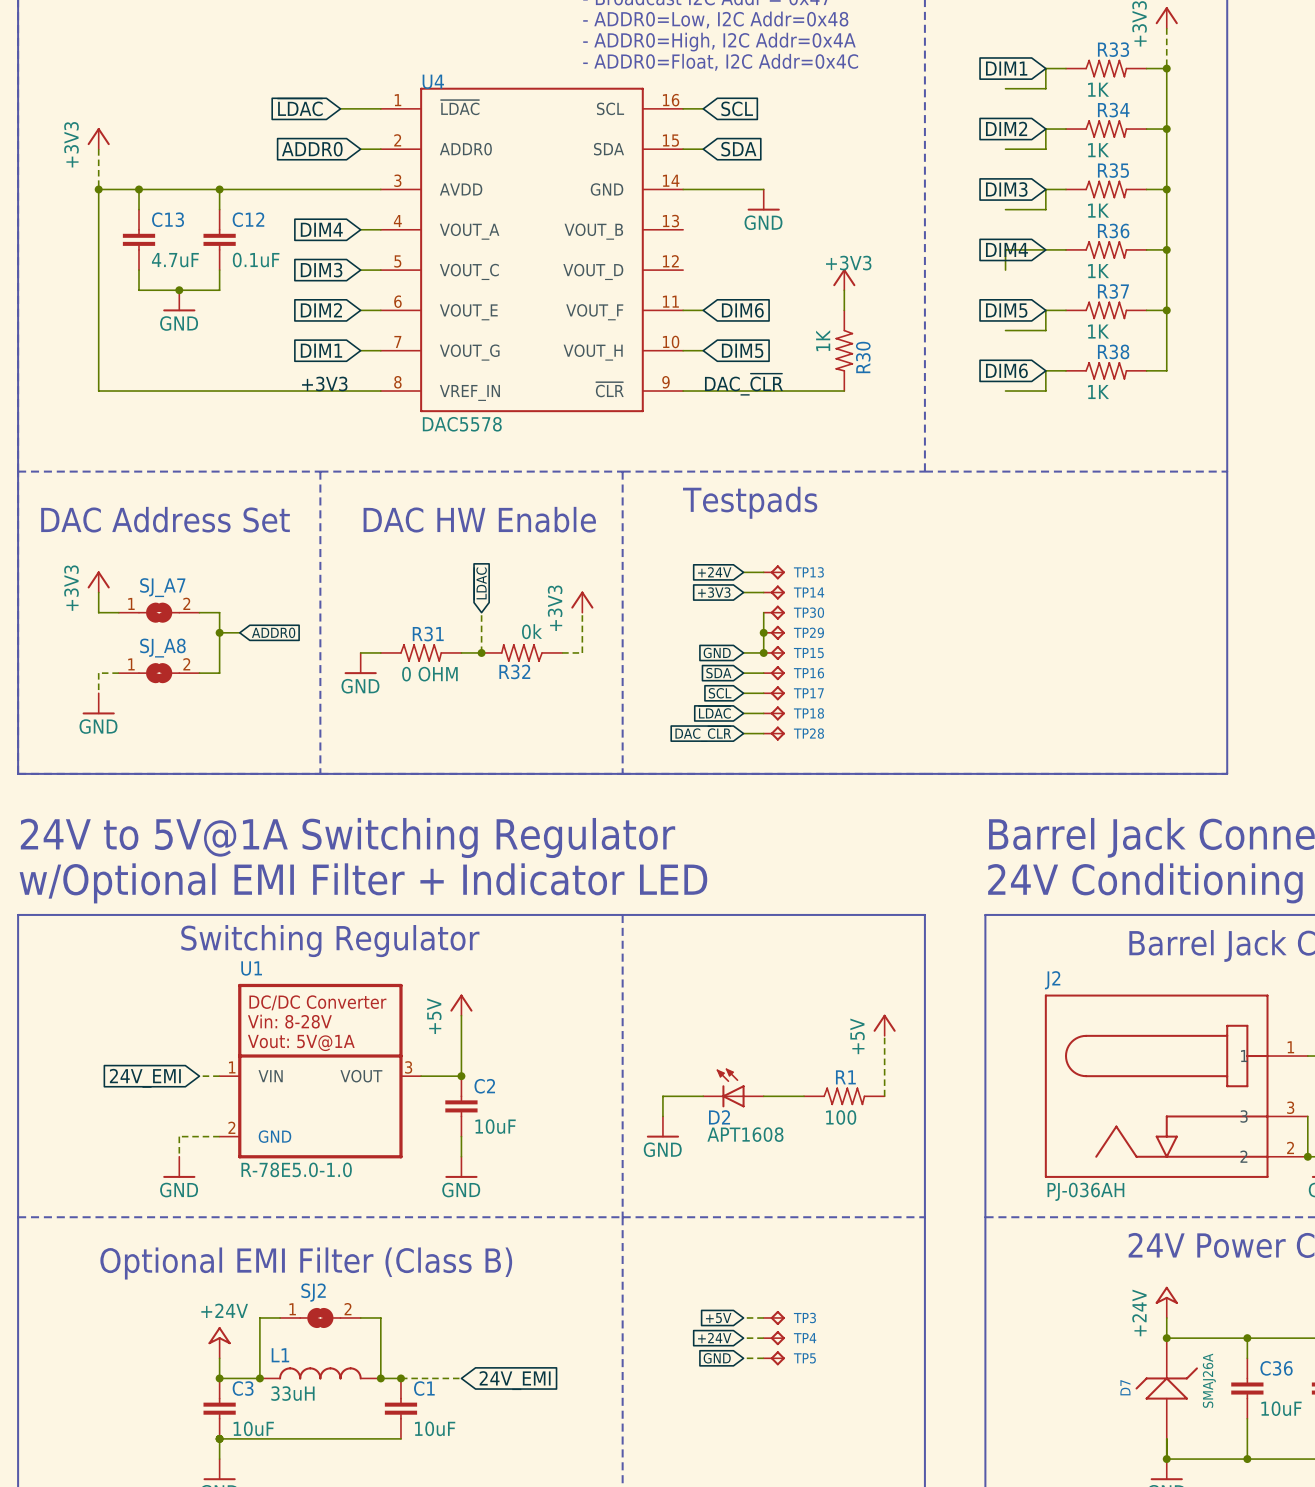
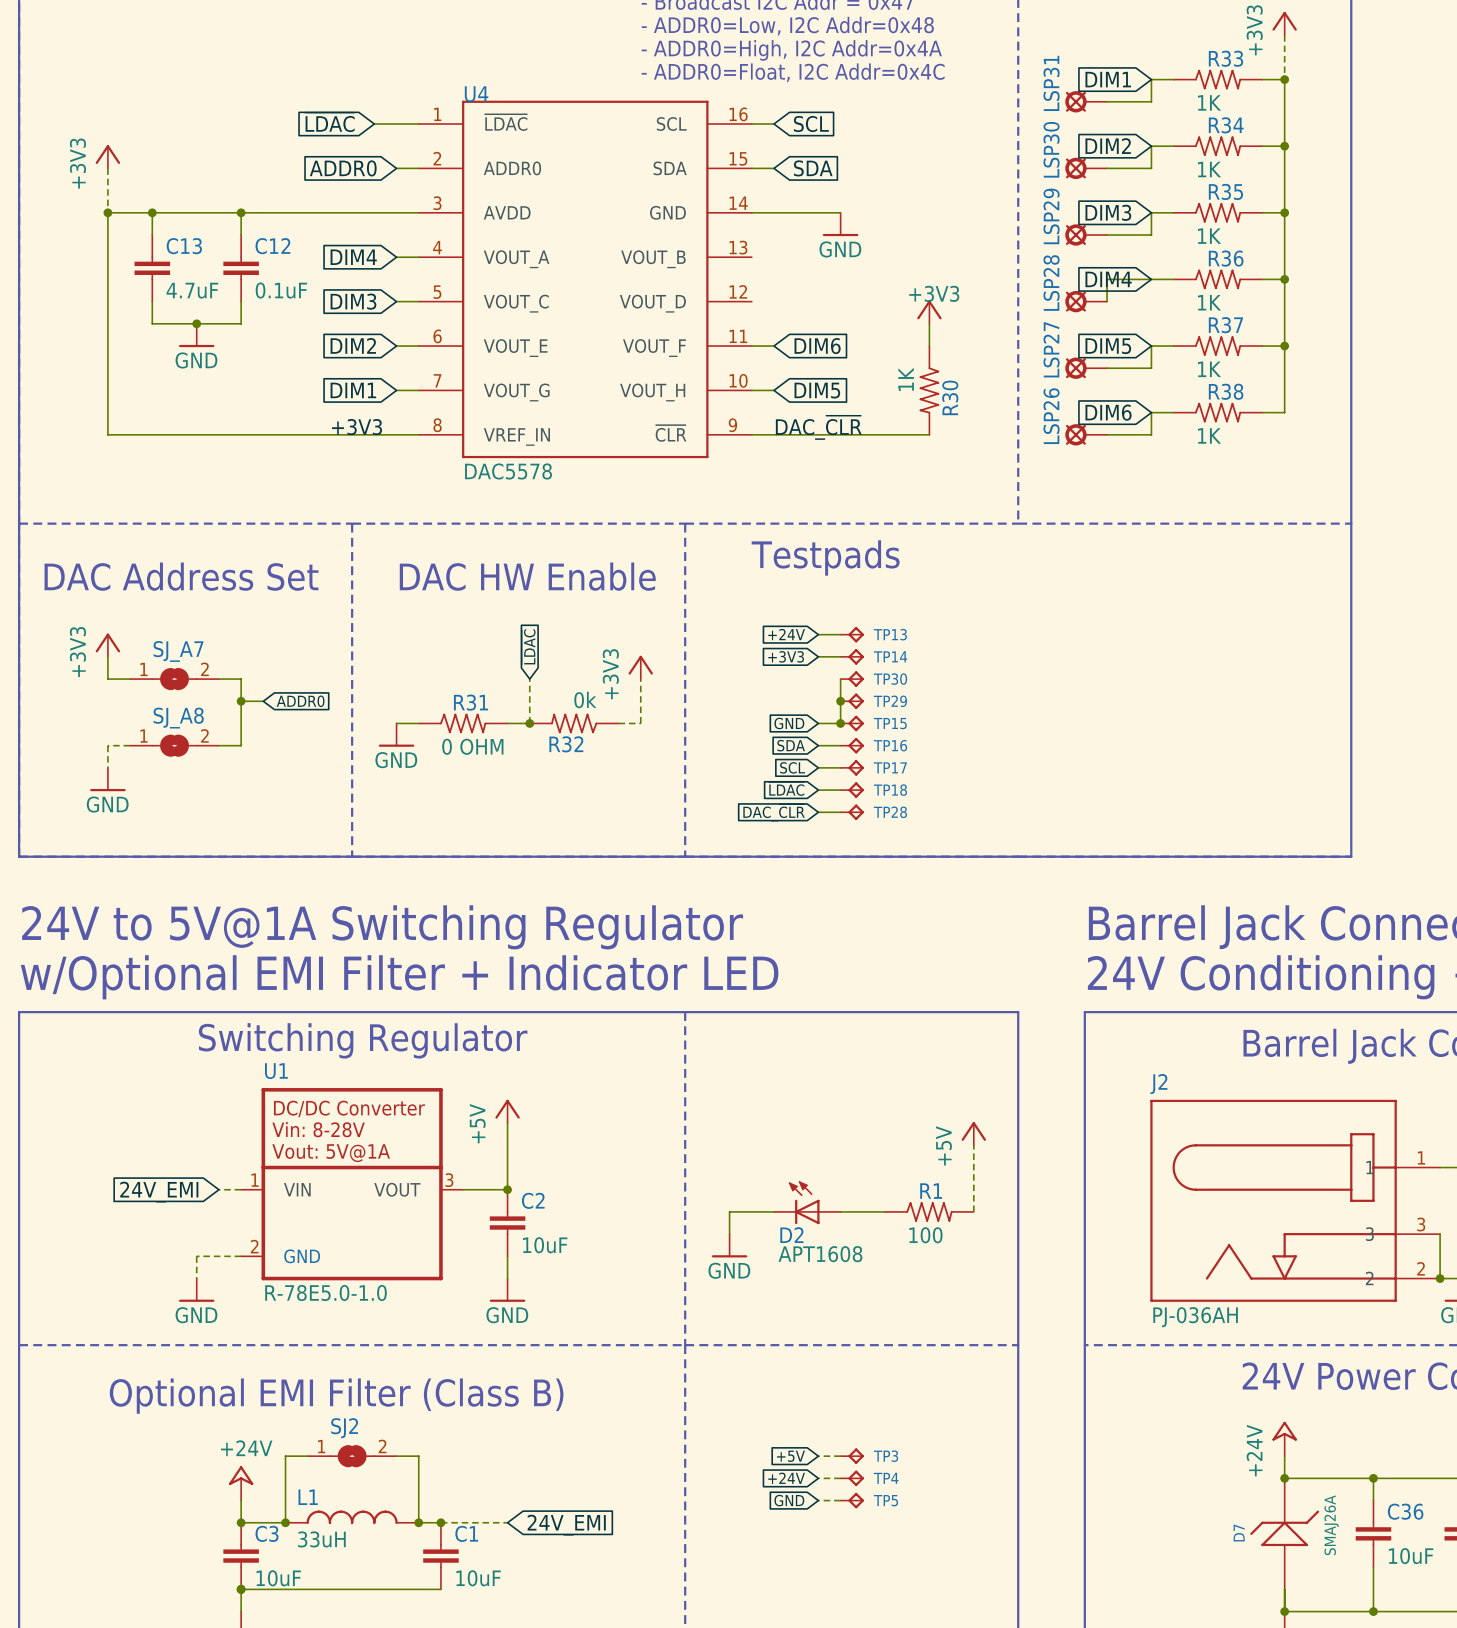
LSP31: none -> (1086, 101)
LSP30: none -> (1086, 168)
LSP29: none -> (1086, 235)
LSP28: none -> (1086, 301)
LSP27: none -> (1086, 368)
LSP26: none -> (1086, 434)

